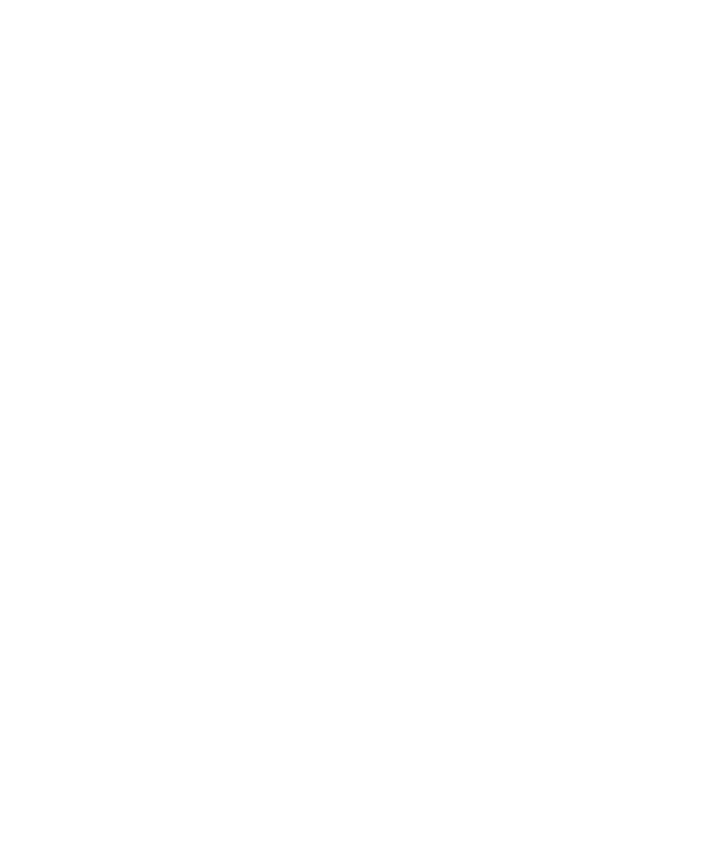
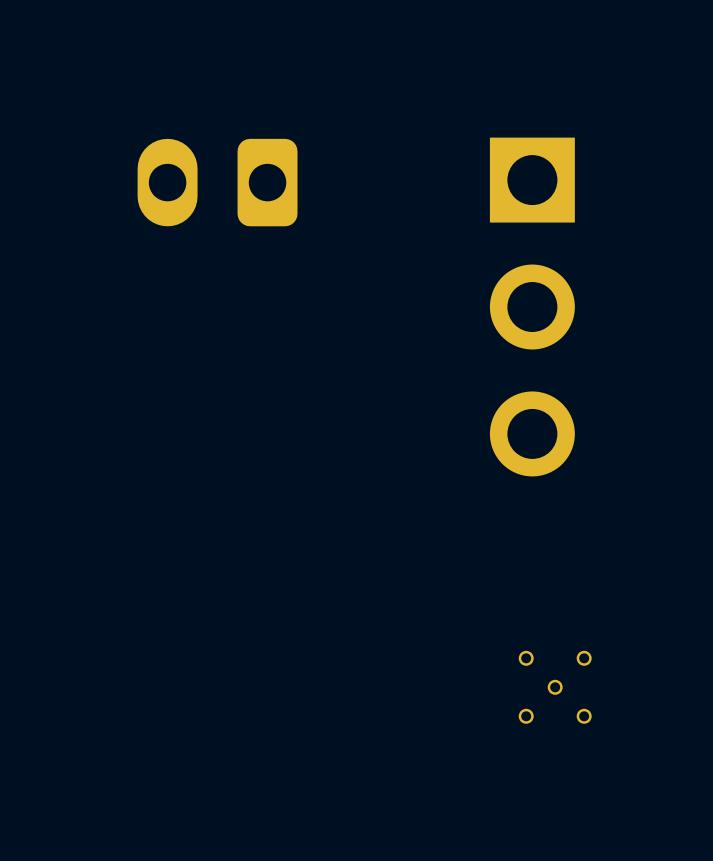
part: none -> (217, 182)
part: none -> (532, 307)
part: none -> (555, 687)

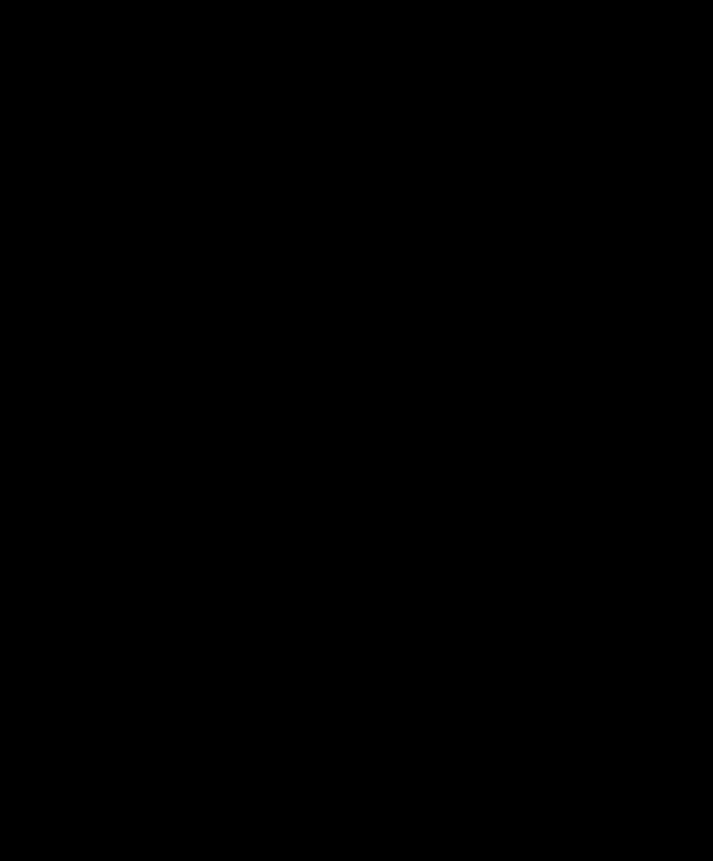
part: (217, 182) -> none
part: (532, 307) -> none
part: (555, 687) -> none

